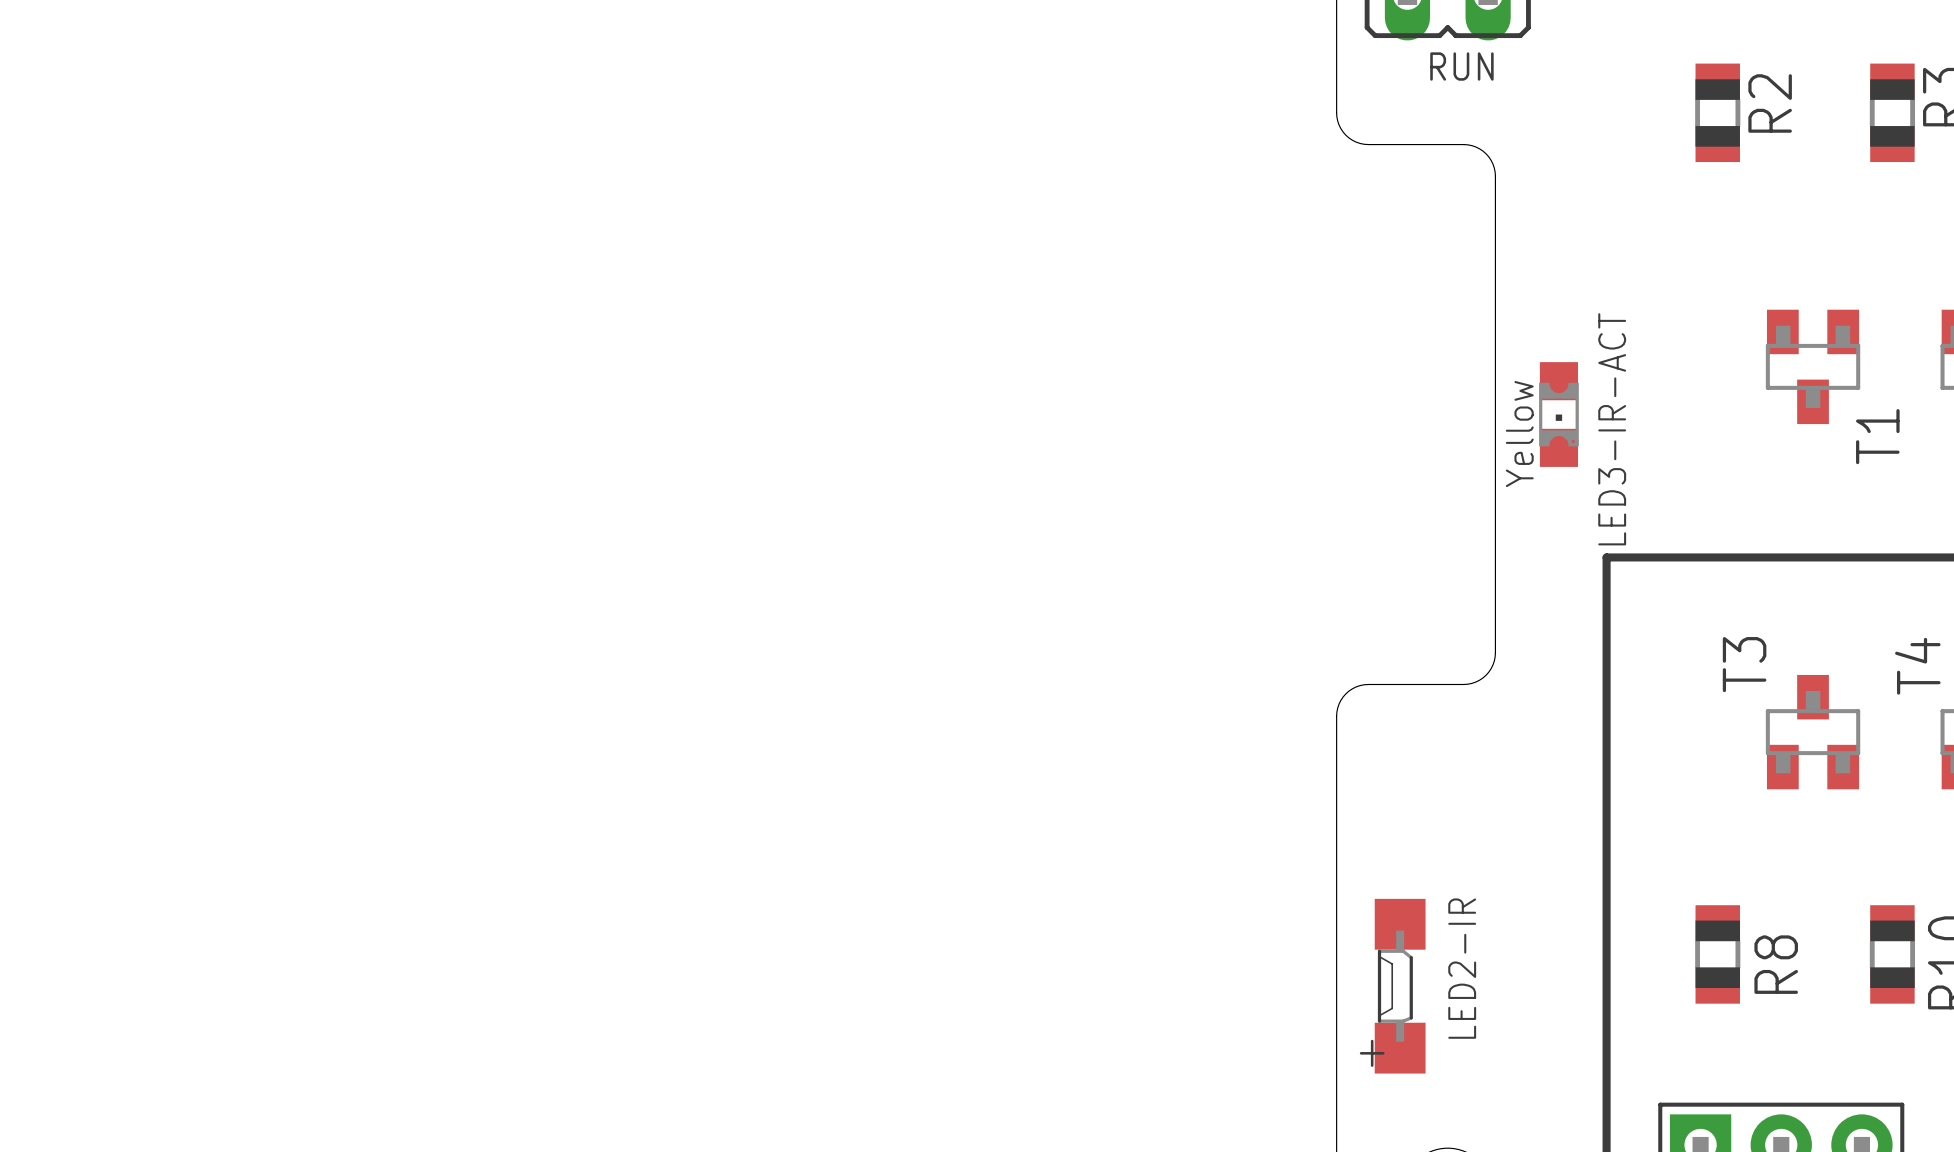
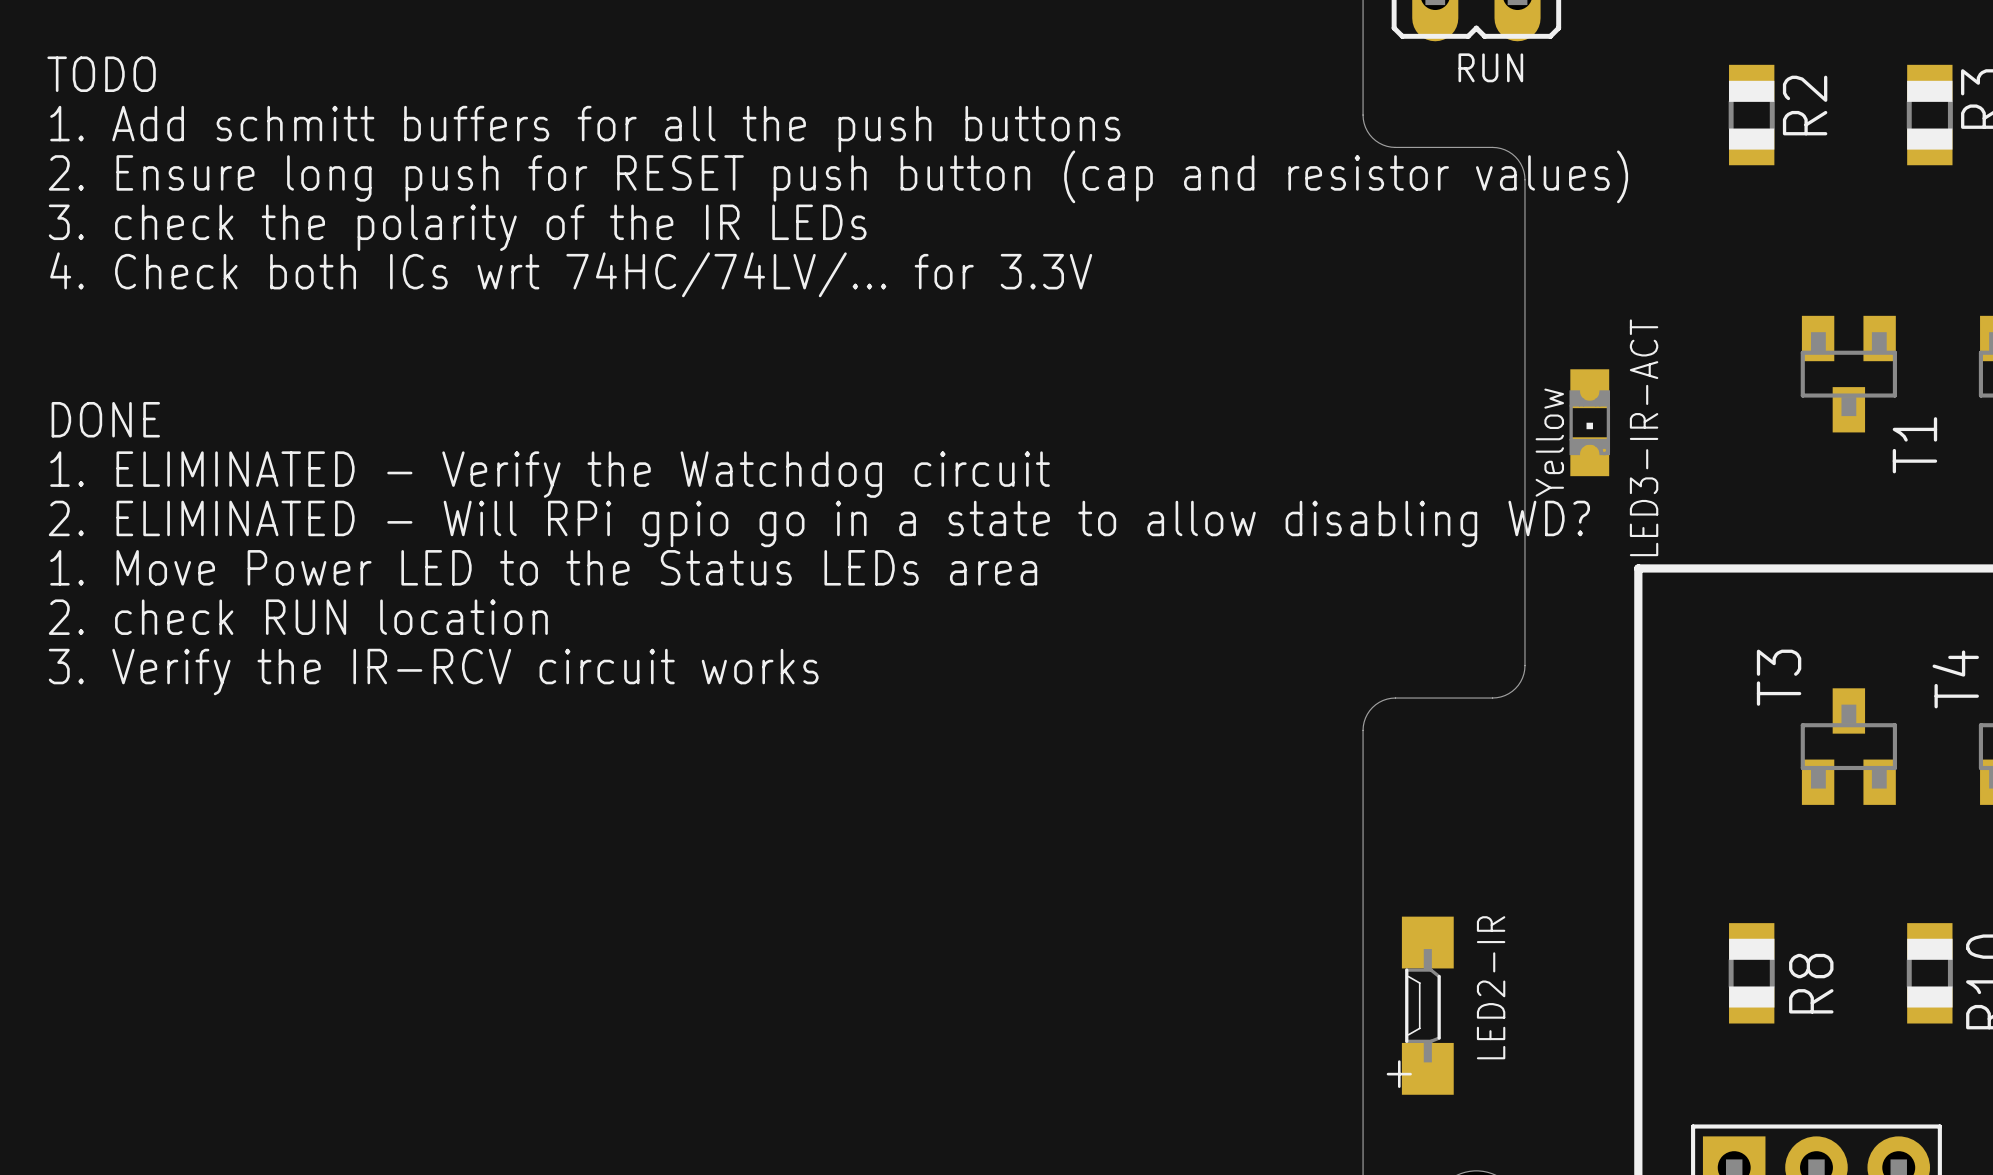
text: none -> TODO (101, 74)
text: none -> 1. Add schmitt buffers for all the push buttons (585, 129)
text: none -> 2. Ensure long push for RESET push button (cap and resistor values) (838, 176)
text: none -> 3. check the polarity of the IR LEDs (457, 227)
text: none -> 4. Check both ICs wrt 74HC/74LV/... for 3.3V (571, 274)
text: none -> DONE (105, 419)
text: none -> 1. ELIMINATED - Verify the Watchdog circuit (550, 474)
text: none -> 2. ELIMINATED - Will RPi gpio go in a state to allow disabling WD? (819, 523)
text: none -> 1. Move Power LED to the Status LEDs area (543, 567)
text: none -> 2. check RUN location (298, 617)
text: none -> 3. Verify the IR-RCV circuit works (433, 672)

